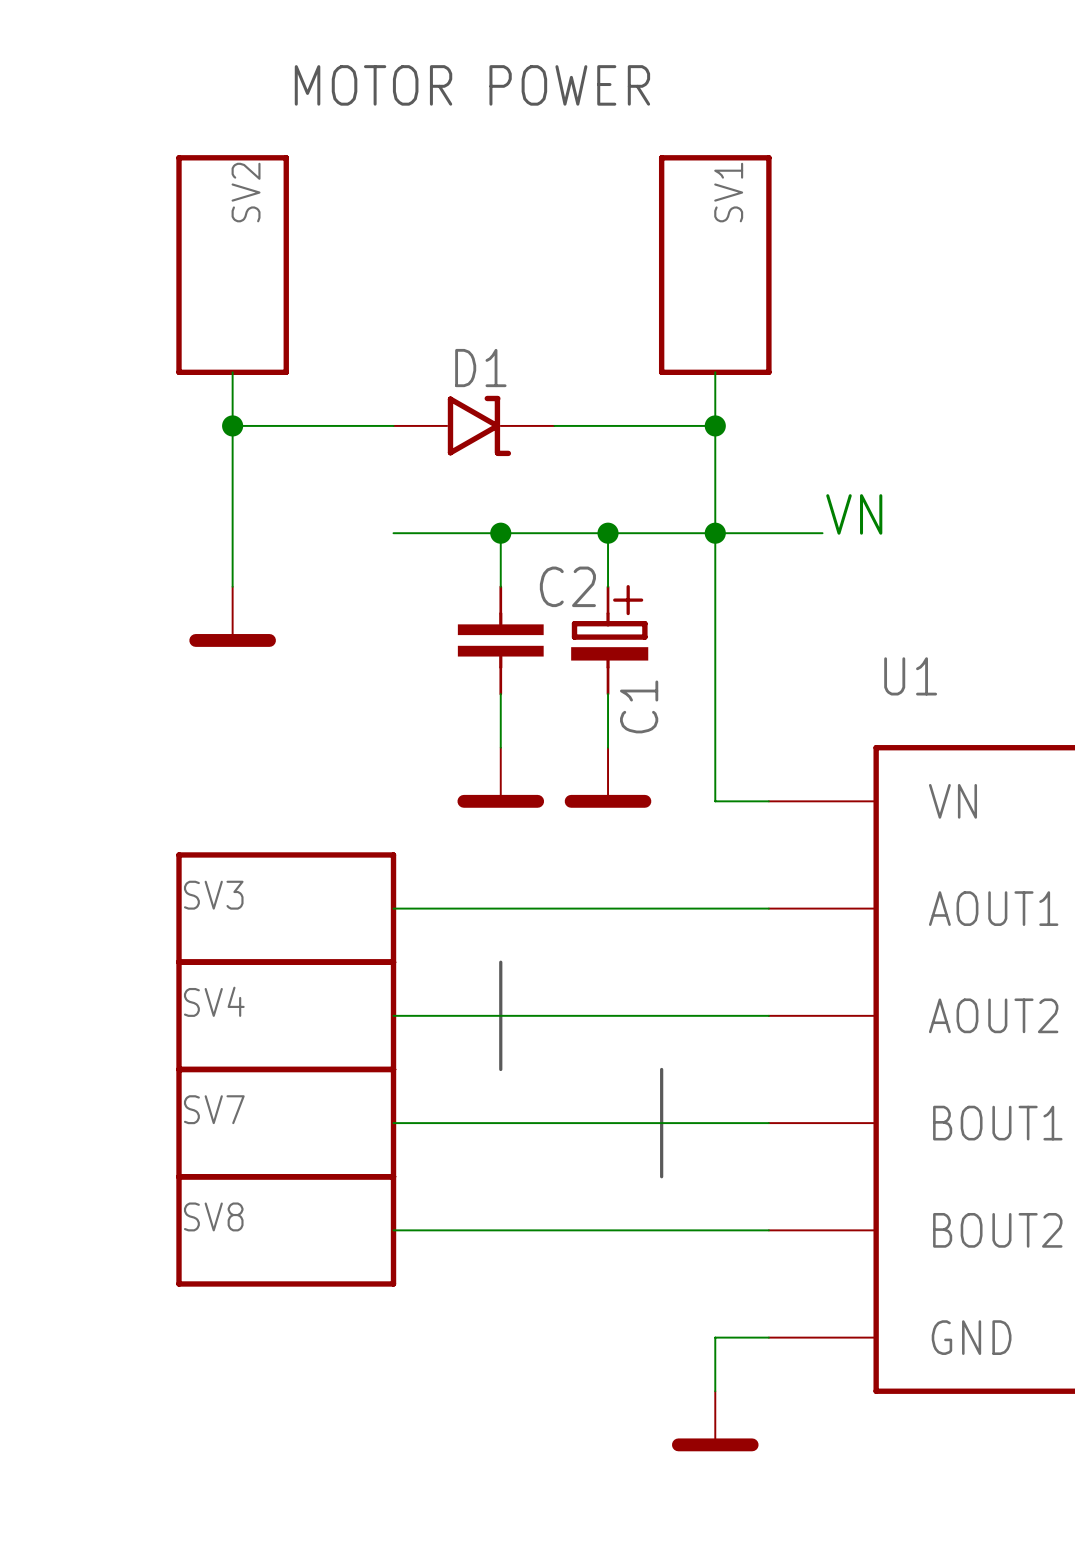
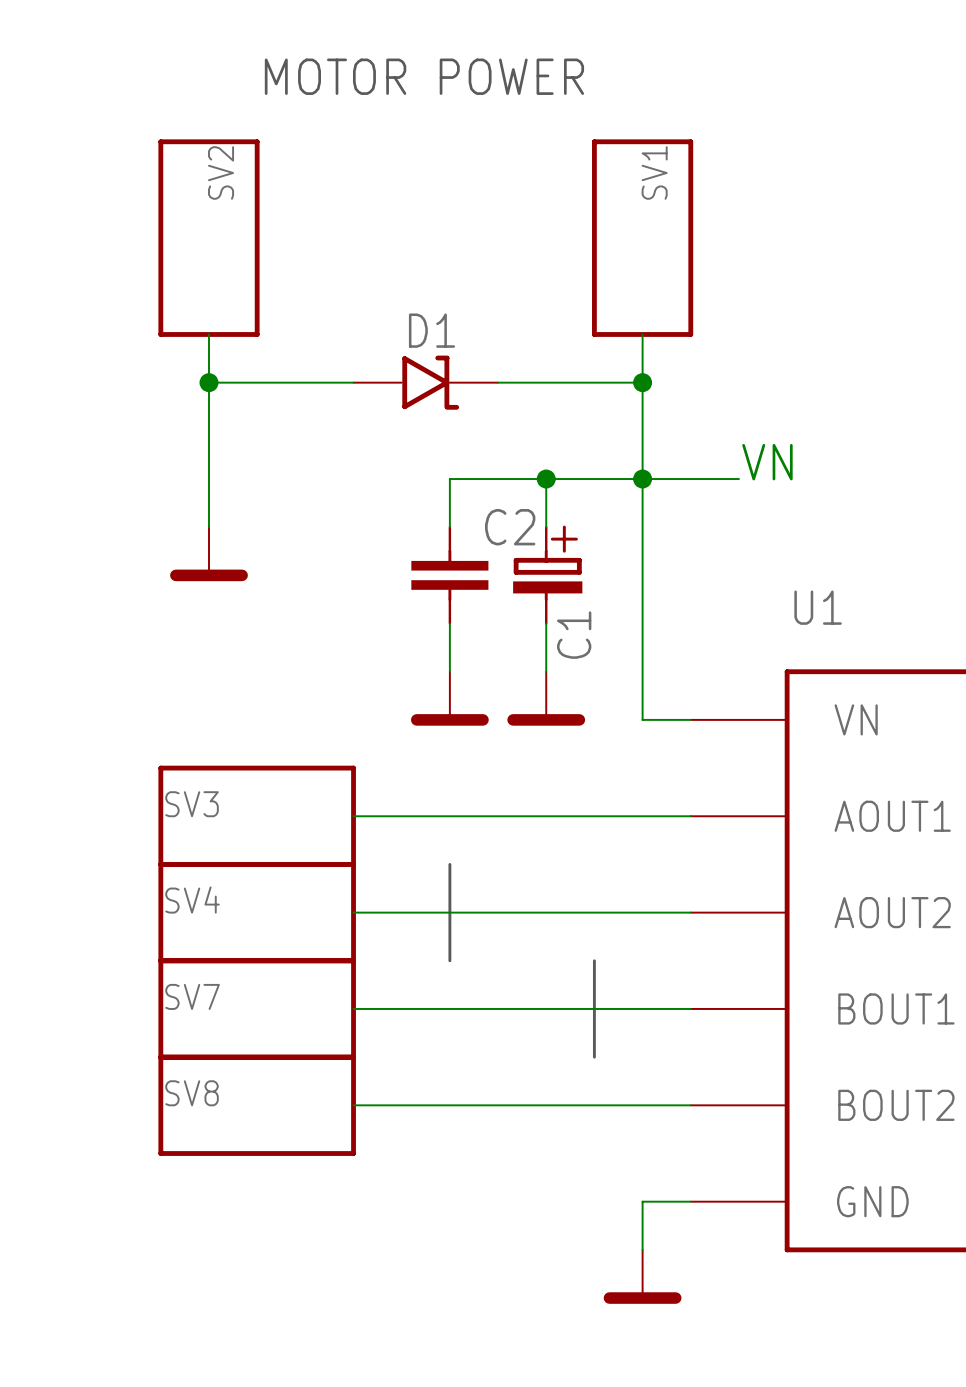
wire: (393, 533) (500, 533) -> none
junction: (500, 533) -> none

